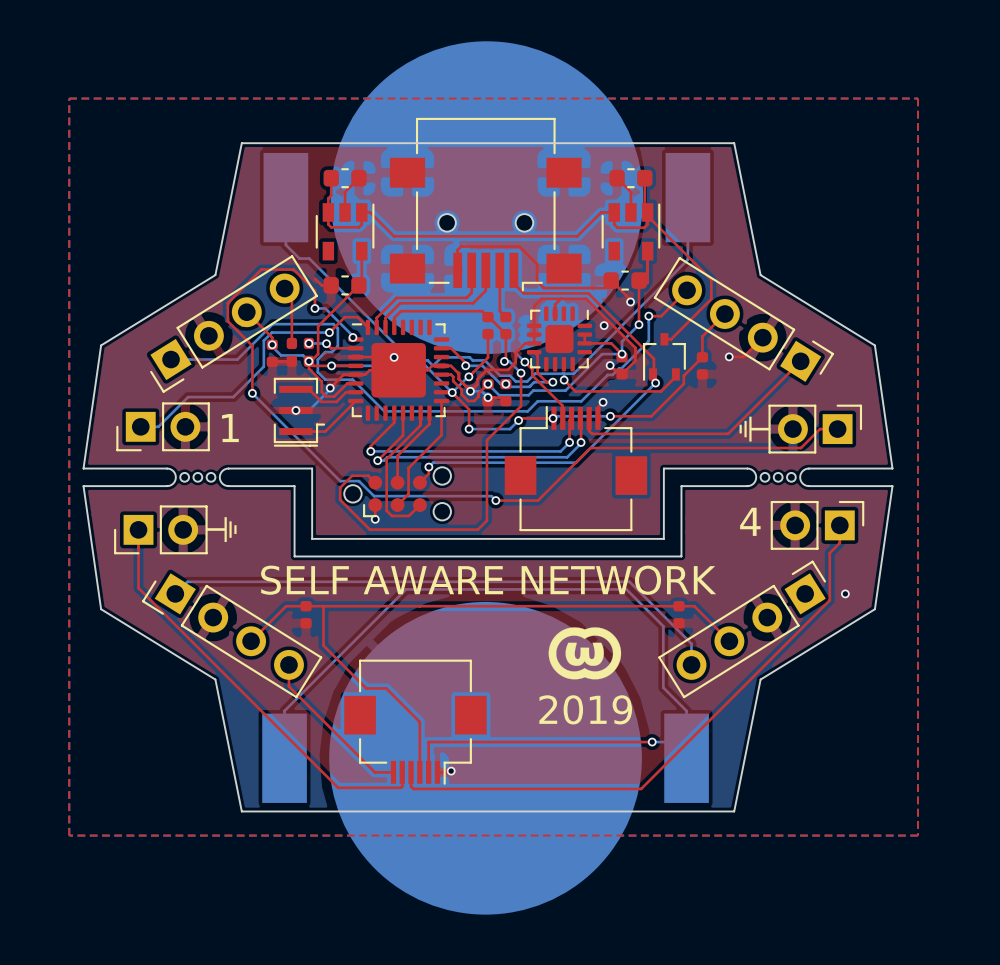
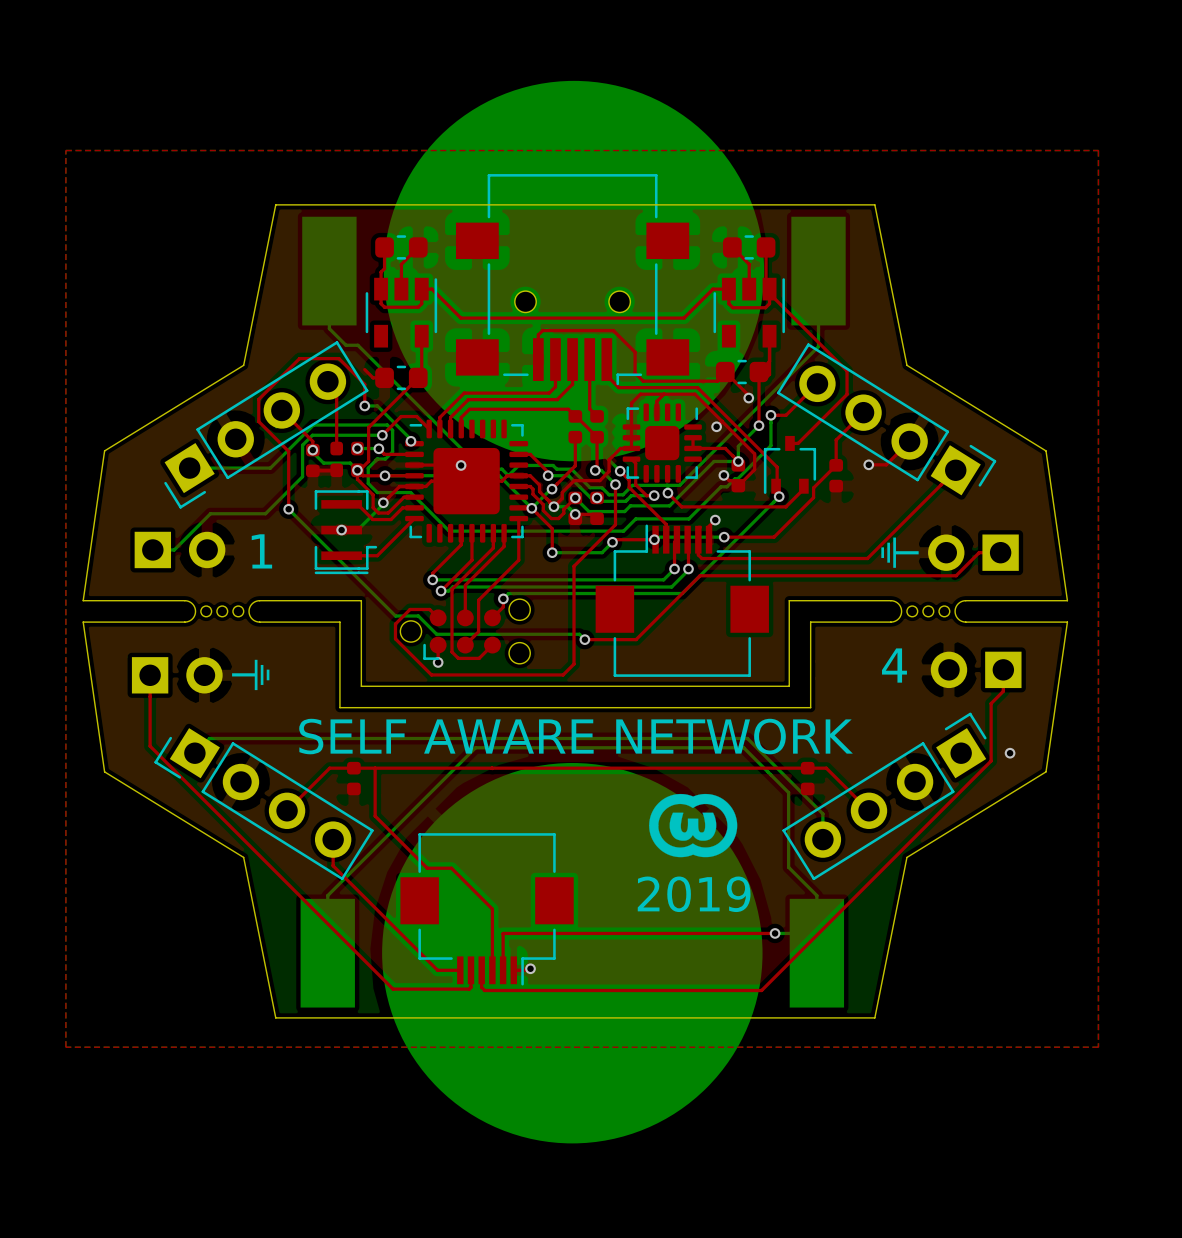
part footprint: [116, 402, 210, 452] -> [134, 531, 226, 569]
part footprint: [768, 404, 863, 454] -> [928, 534, 1019, 571]
part footprint: [770, 500, 865, 550] -> [930, 651, 1022, 689]
part footprint: [114, 505, 208, 555] -> [131, 657, 223, 694]

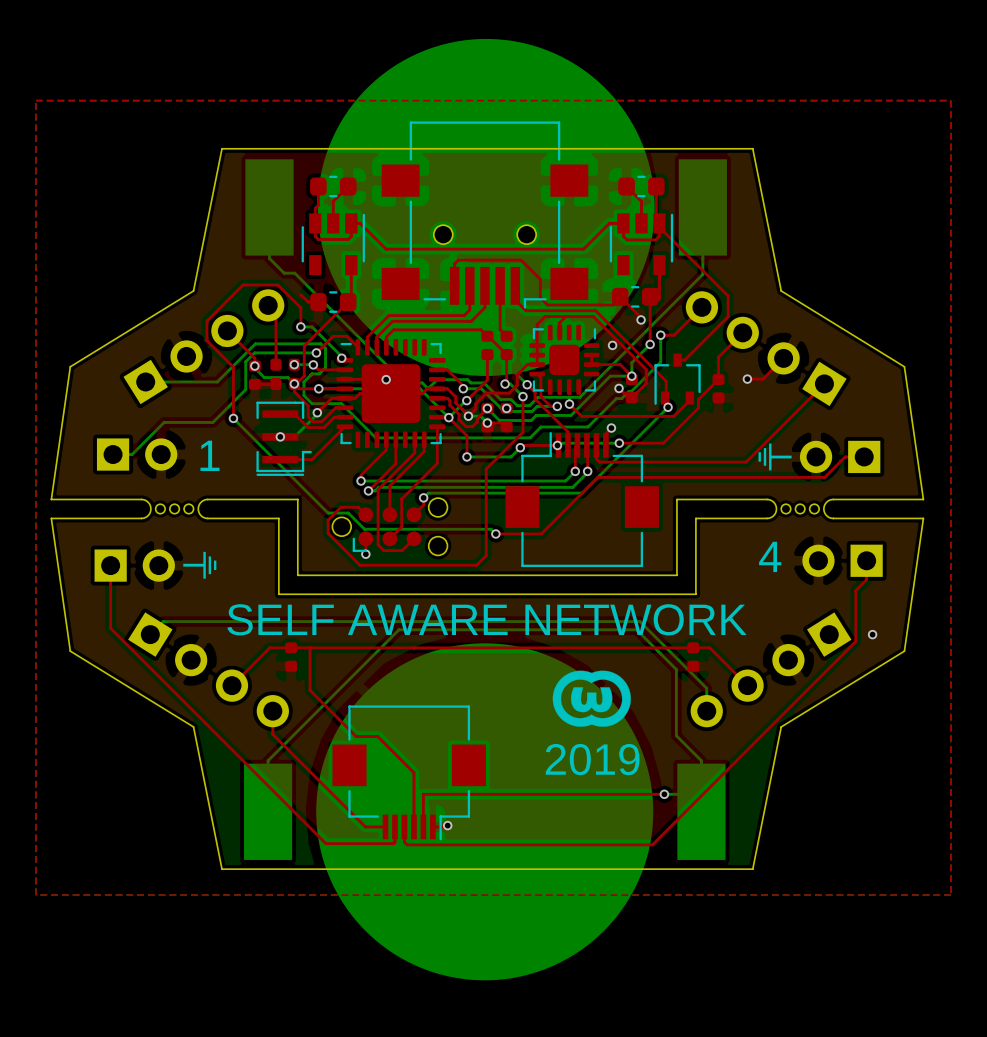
part footprint: [164, 341, 369, 509] -> [123, 289, 285, 405]
part footprint: [776, 343, 997, 496] -> [685, 291, 847, 407]
part footprint: [782, 712, 987, 881] -> [690, 612, 852, 728]
part footprint: [154, 728, 374, 881] -> [128, 612, 289, 728]

